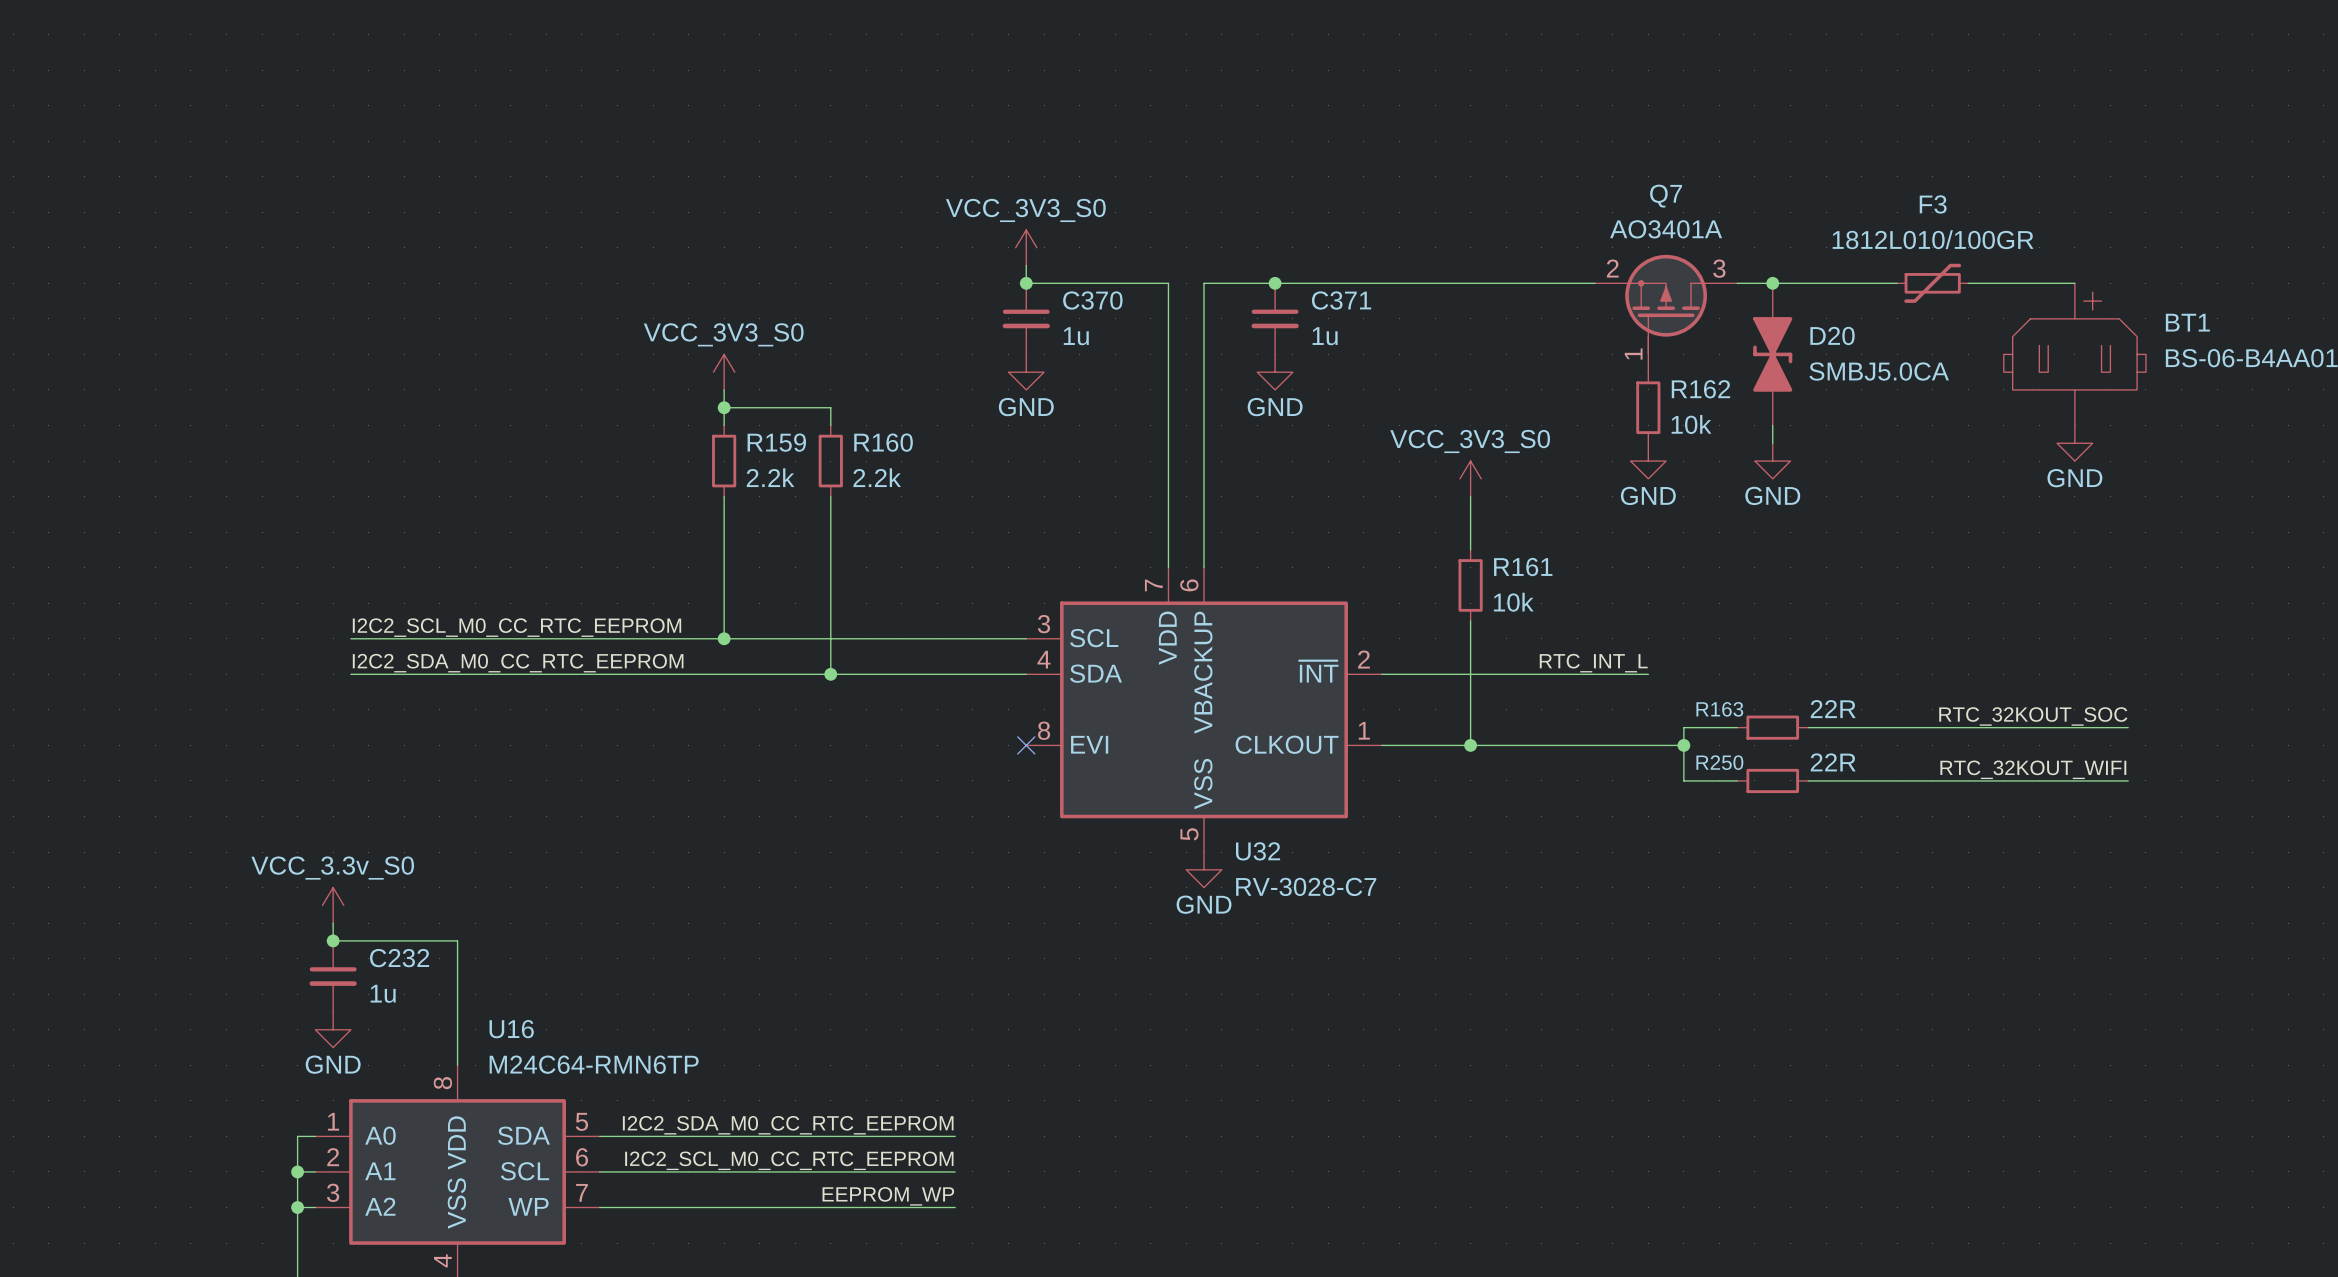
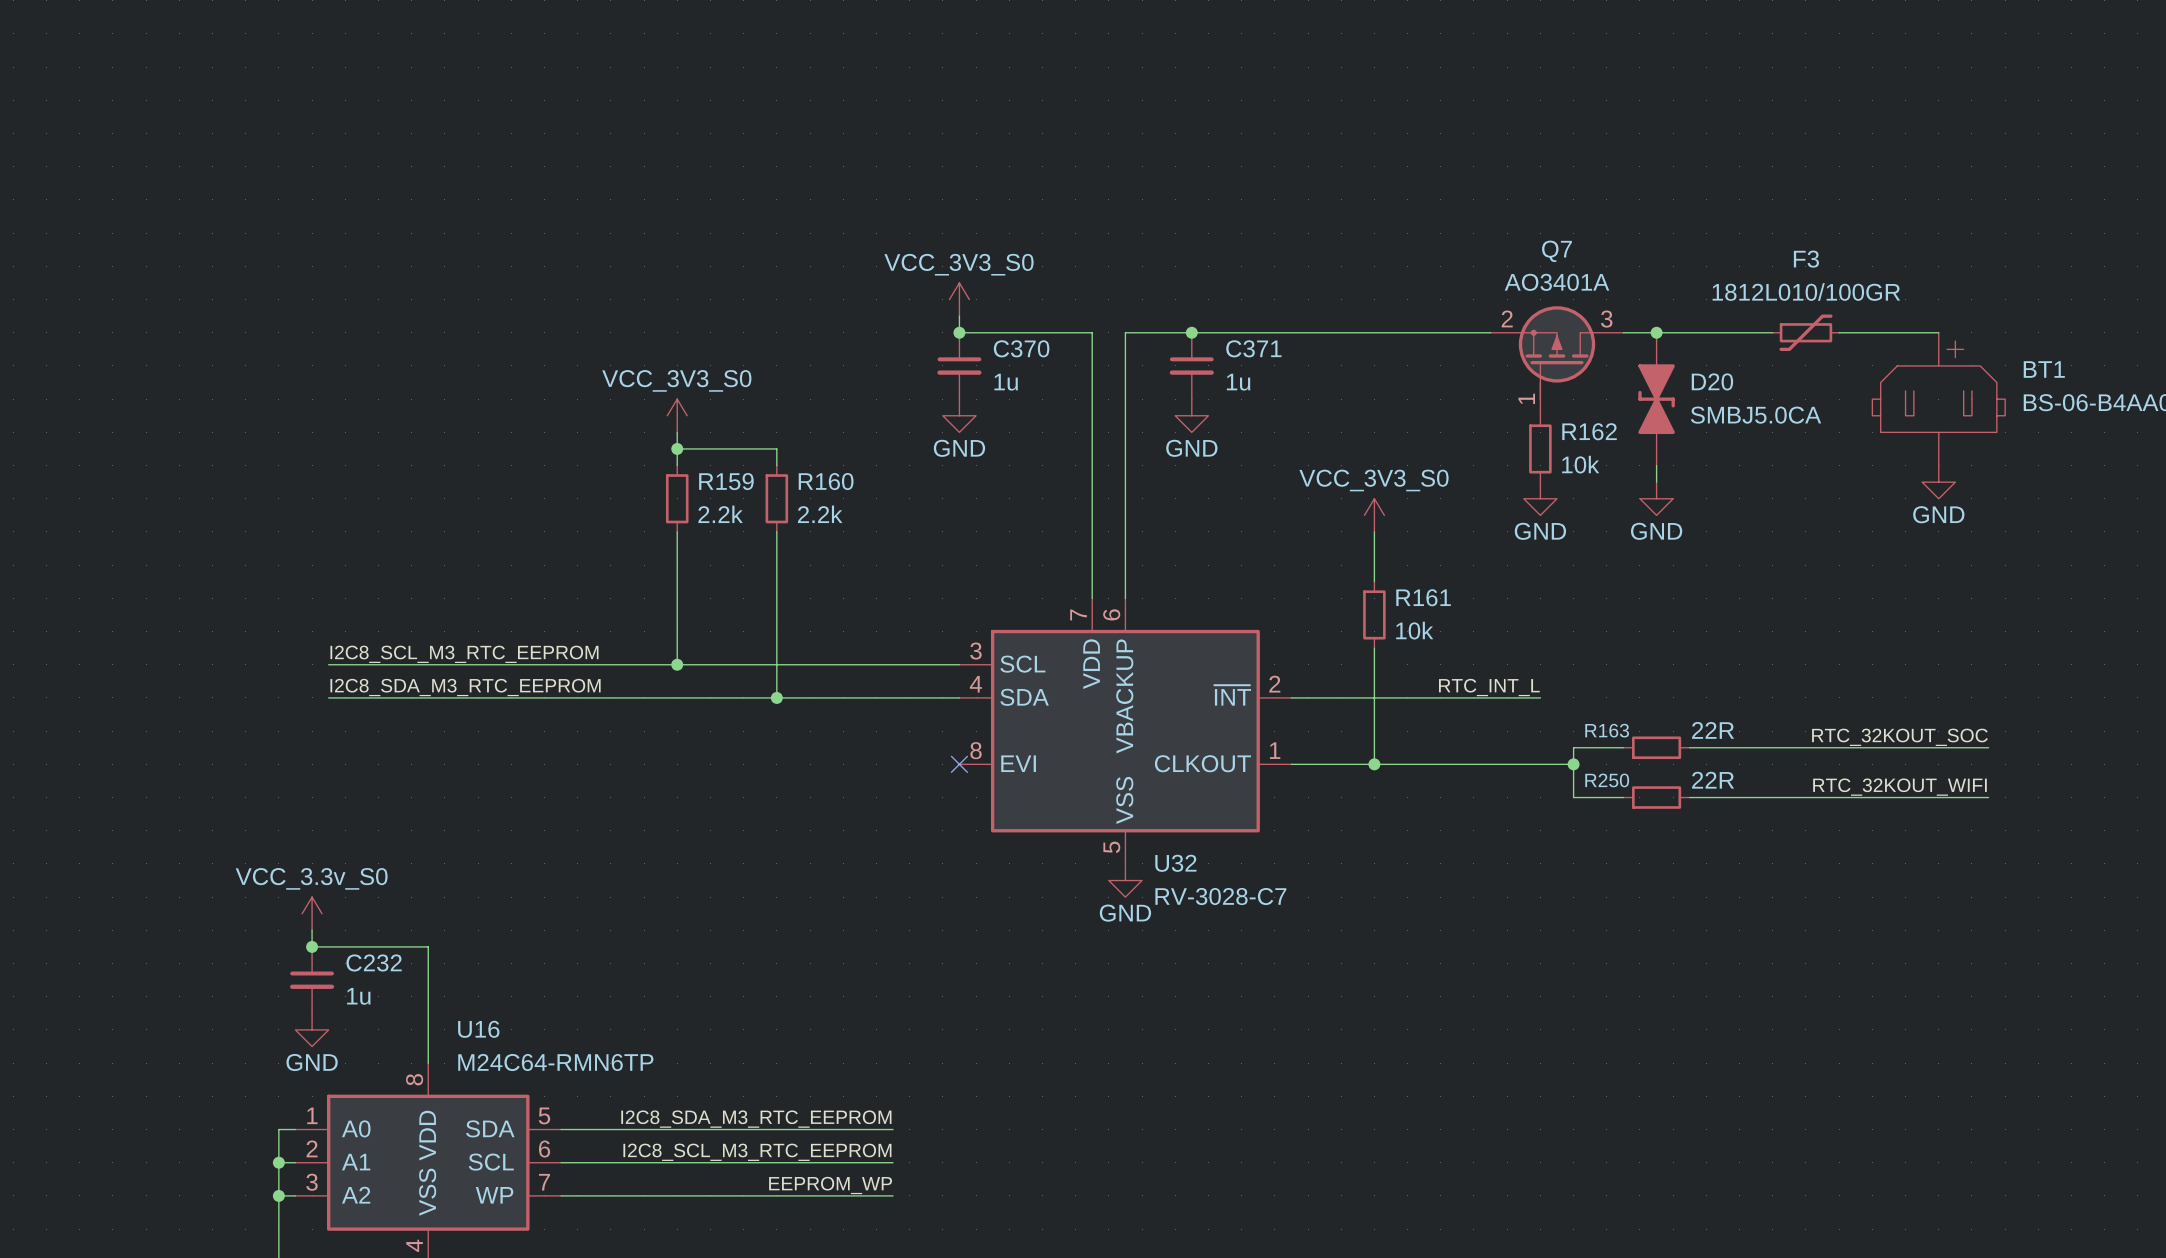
label: I2C2_SCL_M0_CC_RTC_EEPROM (516, 627) -> I2C8_SCL_M3_RTC_EEPROM (464, 654)
label: I2C2_SDA_M0_CC_RTC_EEPROM (518, 663) -> I2C8_SDA_M3_RTC_EEPROM (465, 687)
label: I2C2_SDA_M0_CC_RTC_EEPROM (788, 1125) -> I2C8_SDA_M3_RTC_EEPROM (756, 1119)
label: I2C2_SCL_M0_CC_RTC_EEPROM (789, 1160) -> I2C8_SCL_M3_RTC_EEPROM (757, 1152)

